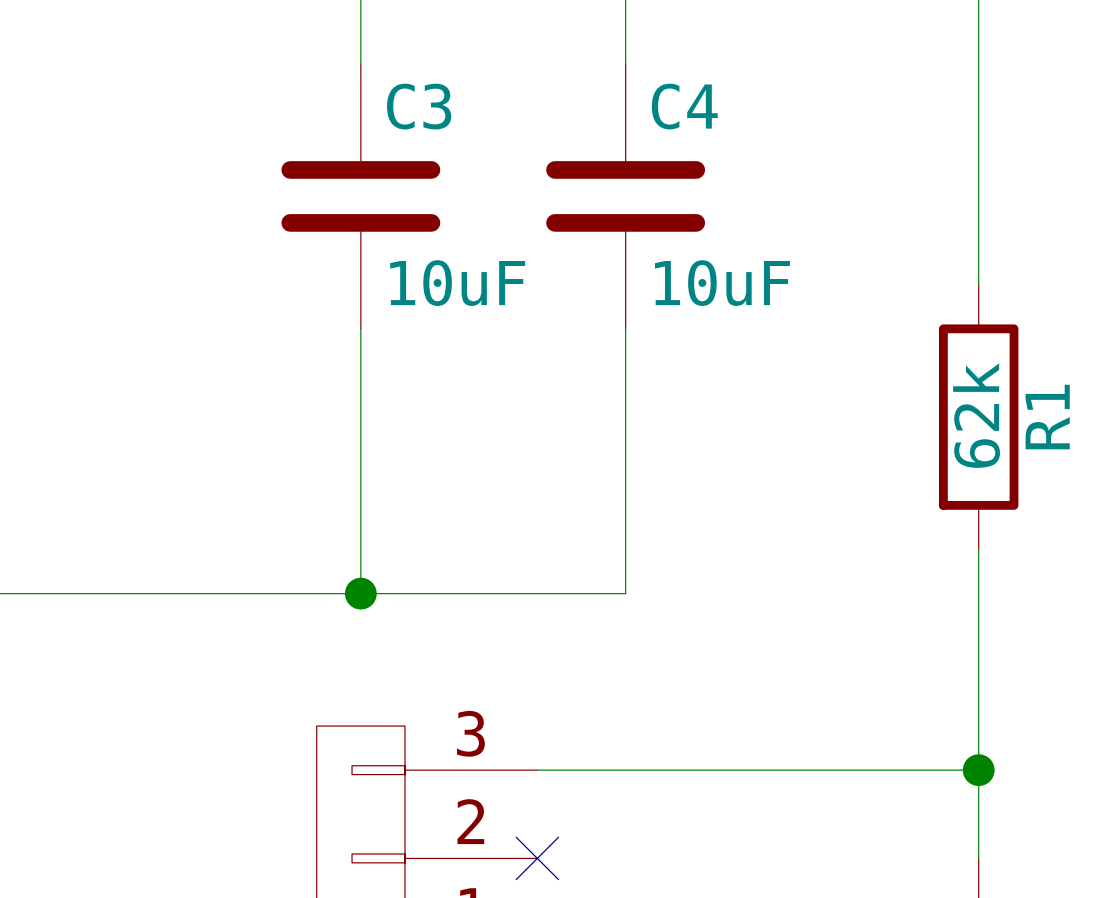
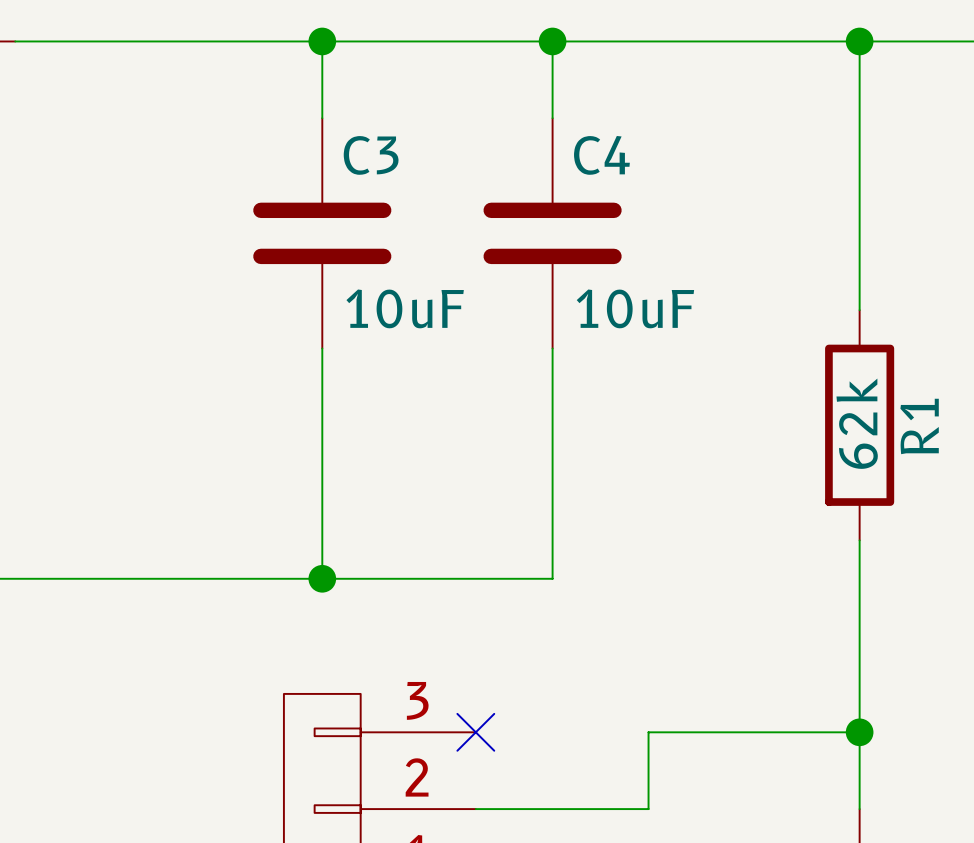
wire: (537, 770) (735, 770) -> (475, 809) (648, 809) (648, 732)
no-connect mark position: (537, 858) -> (475, 732)

